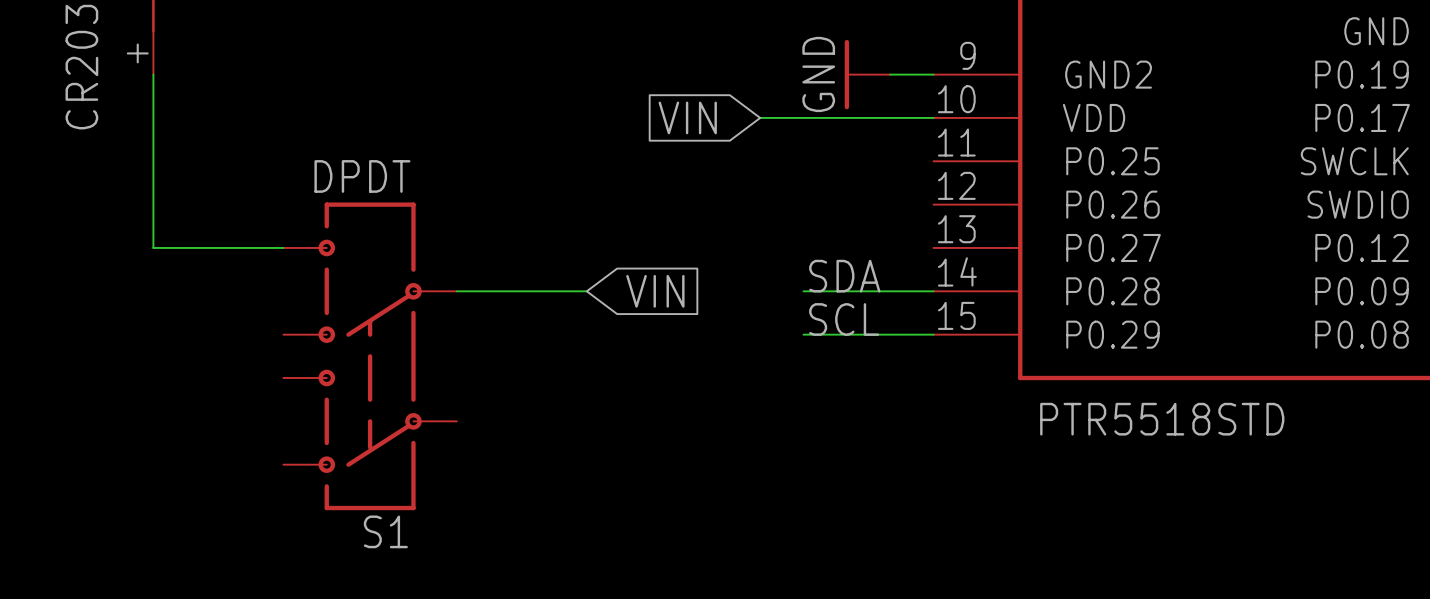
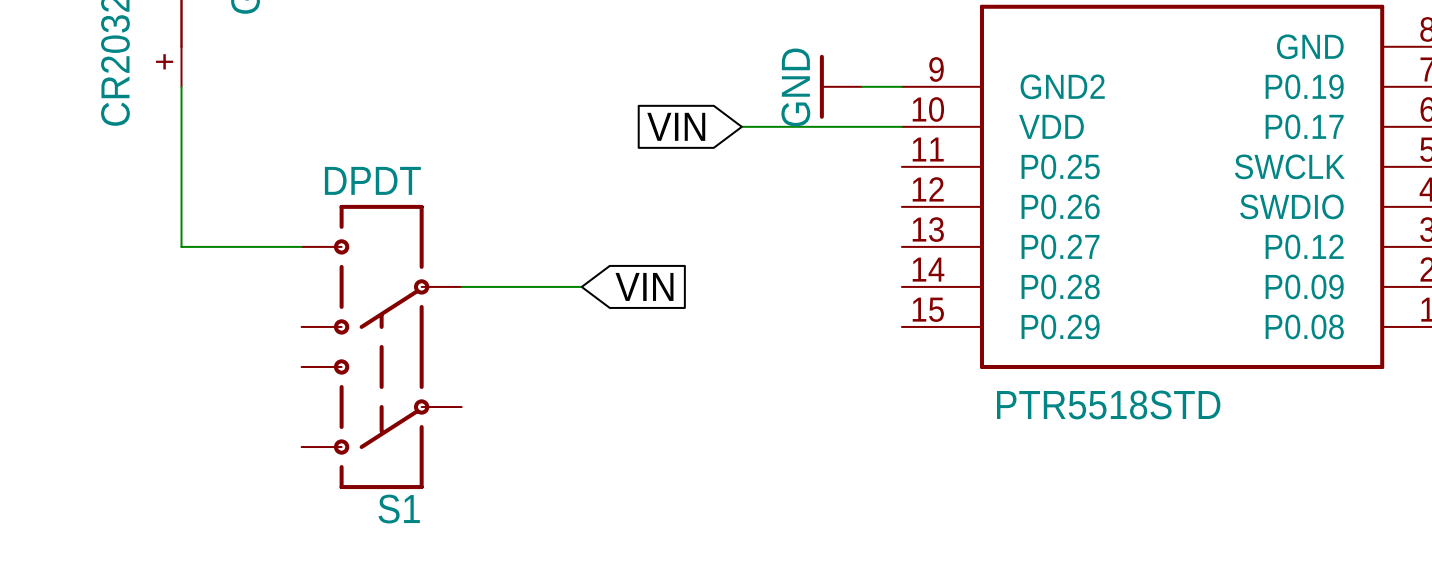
label: SDA (844, 276) -> none
wire: (803, 291) (933, 291) -> none
label: SCL (844, 319) -> none
wire: (803, 334) (933, 334) -> none

